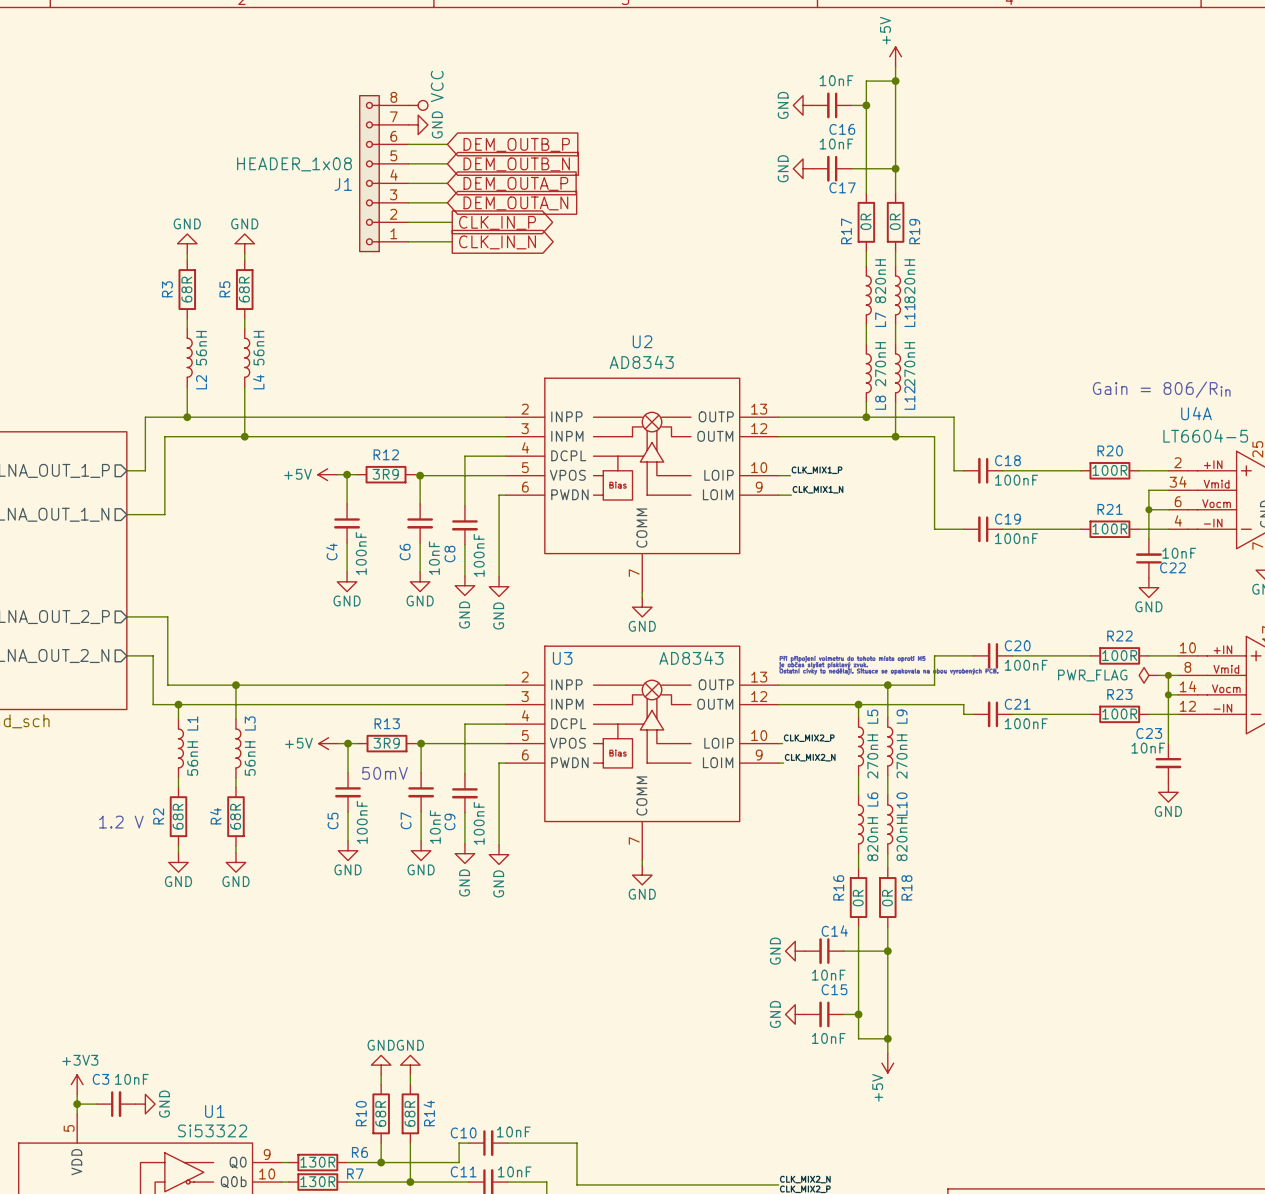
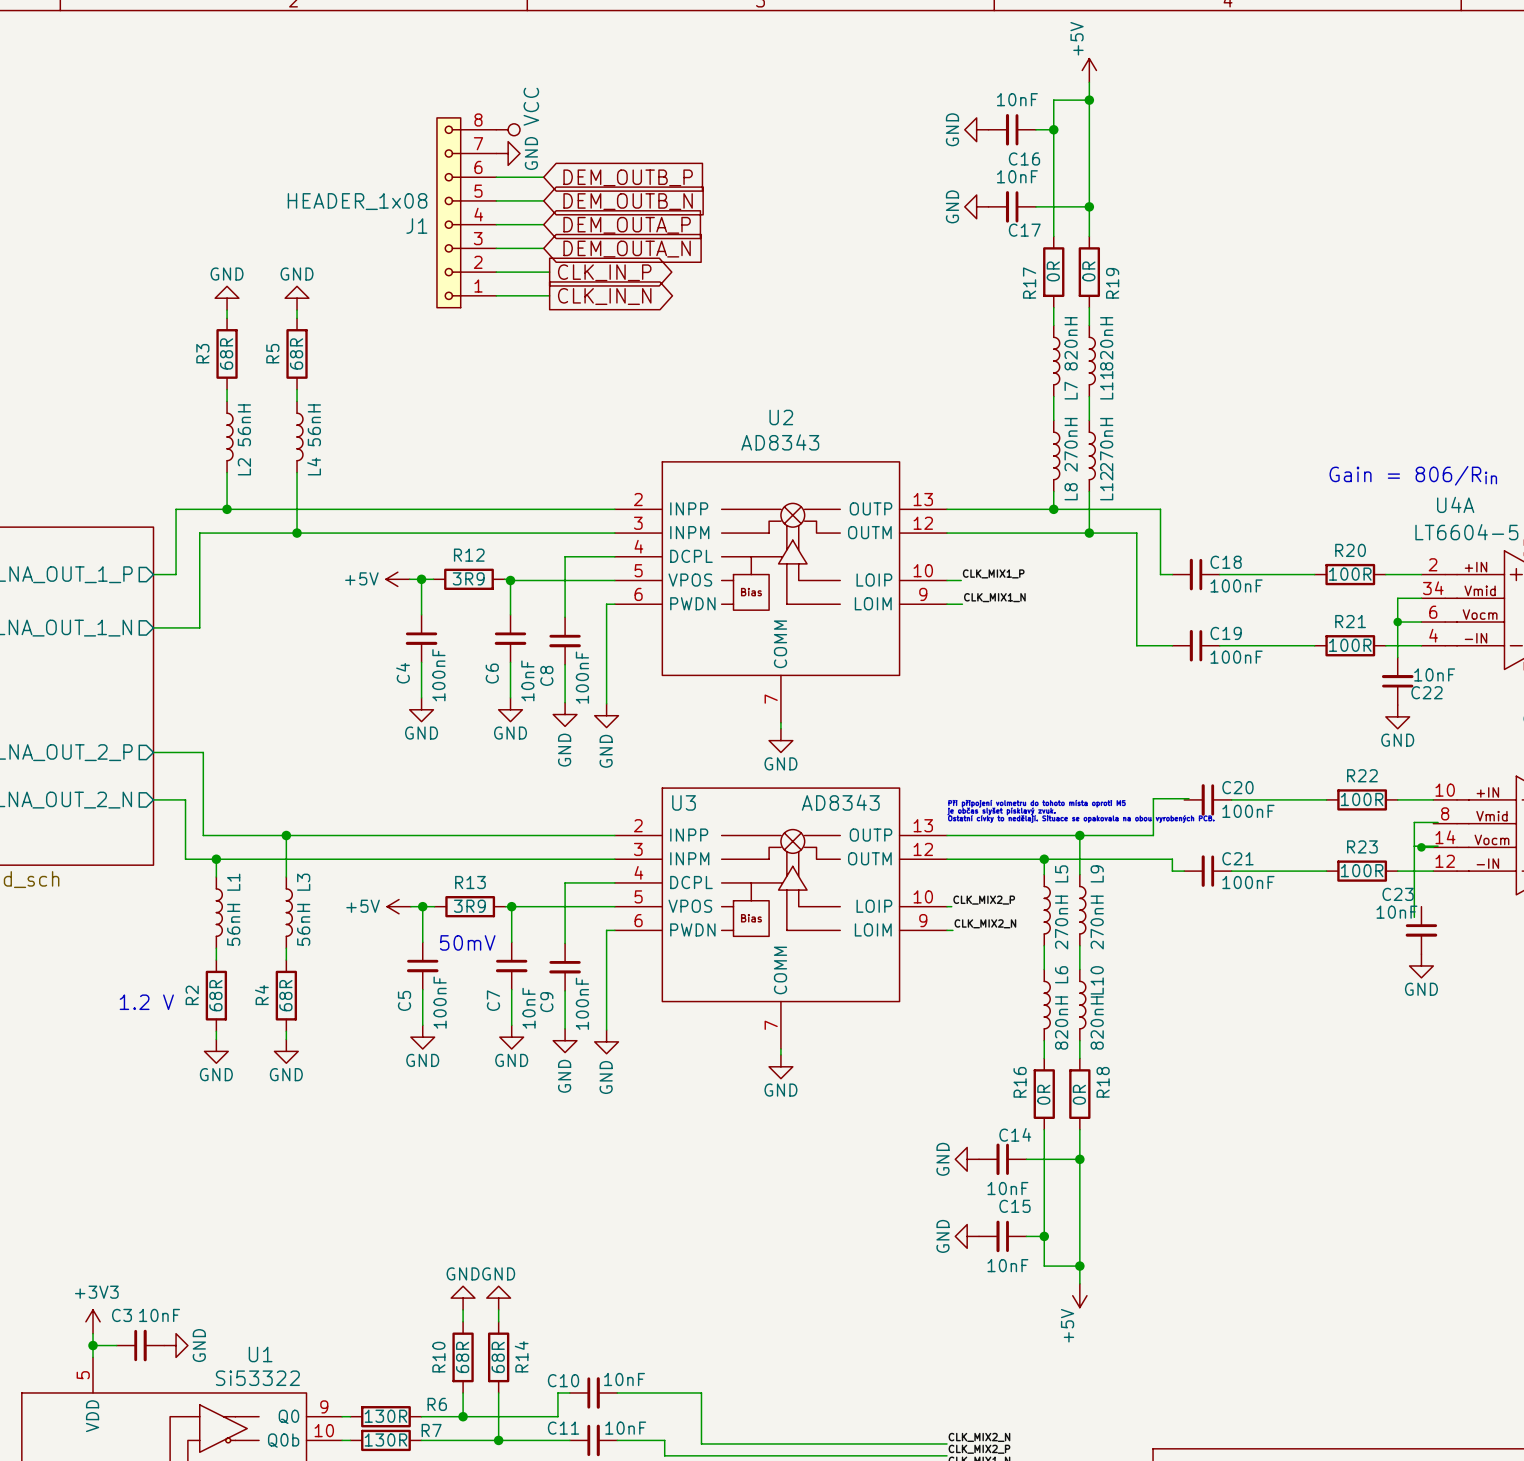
wire: (973, 655) (934, 655) (934, 685) -> (1188, 798) (1153, 798) (1153, 835) (1136, 835)
wire: none -> (1438, 822) (1414, 822) (1414, 917)
power symbol: PWR_FLAG (1148, 675) -> none
wire: (1158, 675) (1178, 675) -> (1414, 846) (1438, 846)
wire: (1168, 675) (1168, 743) -> none
junction: (1168, 675) -> none

